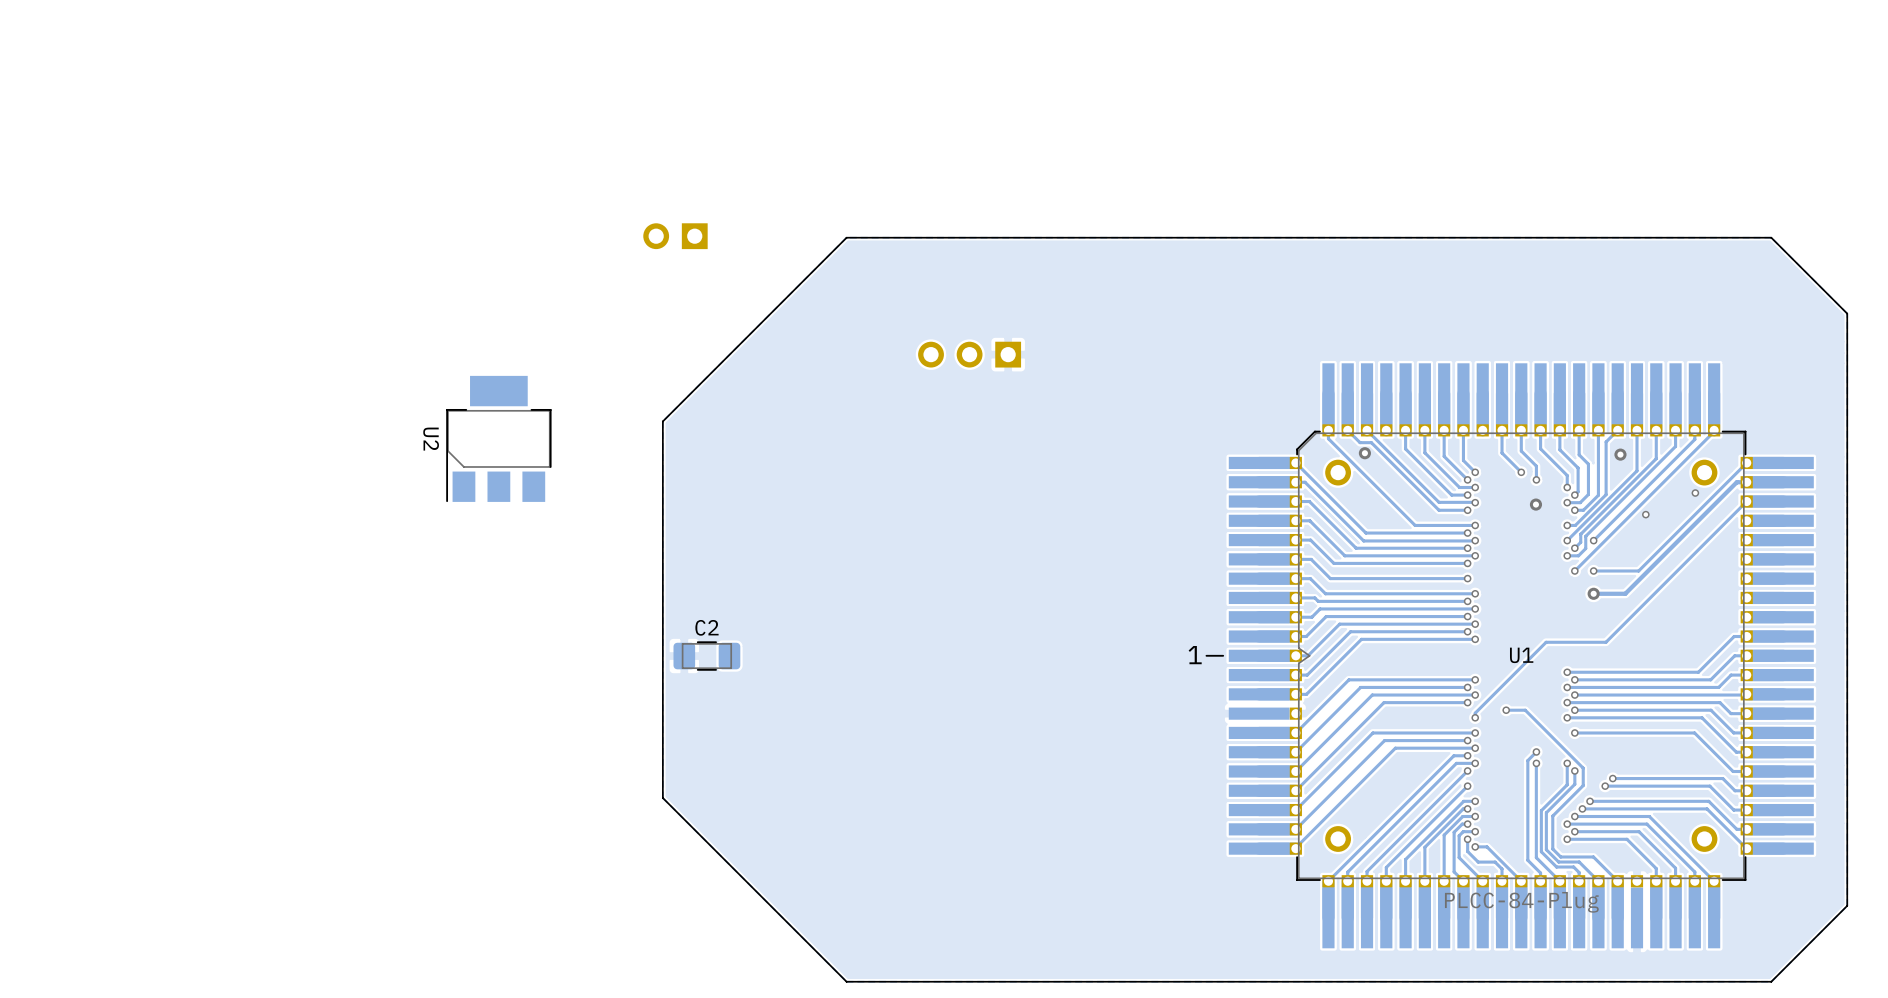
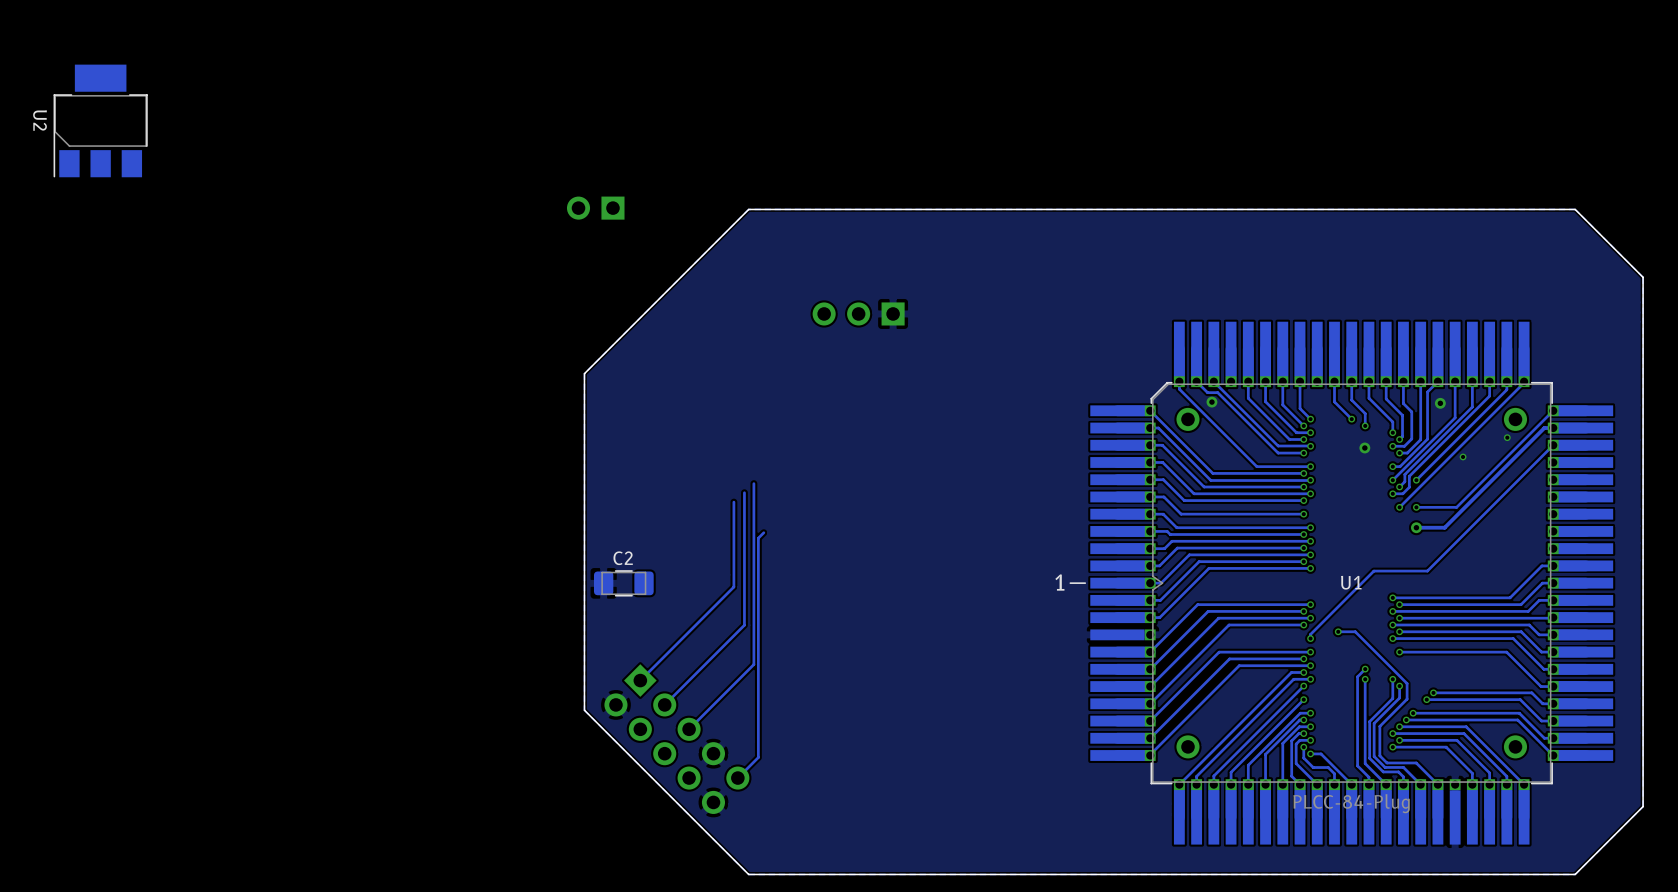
U2 position: (498, 438) -> (100, 121)
track: none -> (753, 483) (753, 664) (689, 729)
track: none -> (744, 492) (744, 625) (664, 704)
track: none -> (733, 502) (733, 587) (640, 680)
track: none -> (763, 532) (758, 538) (758, 757) (737, 778)
part: none -> (676, 739)

